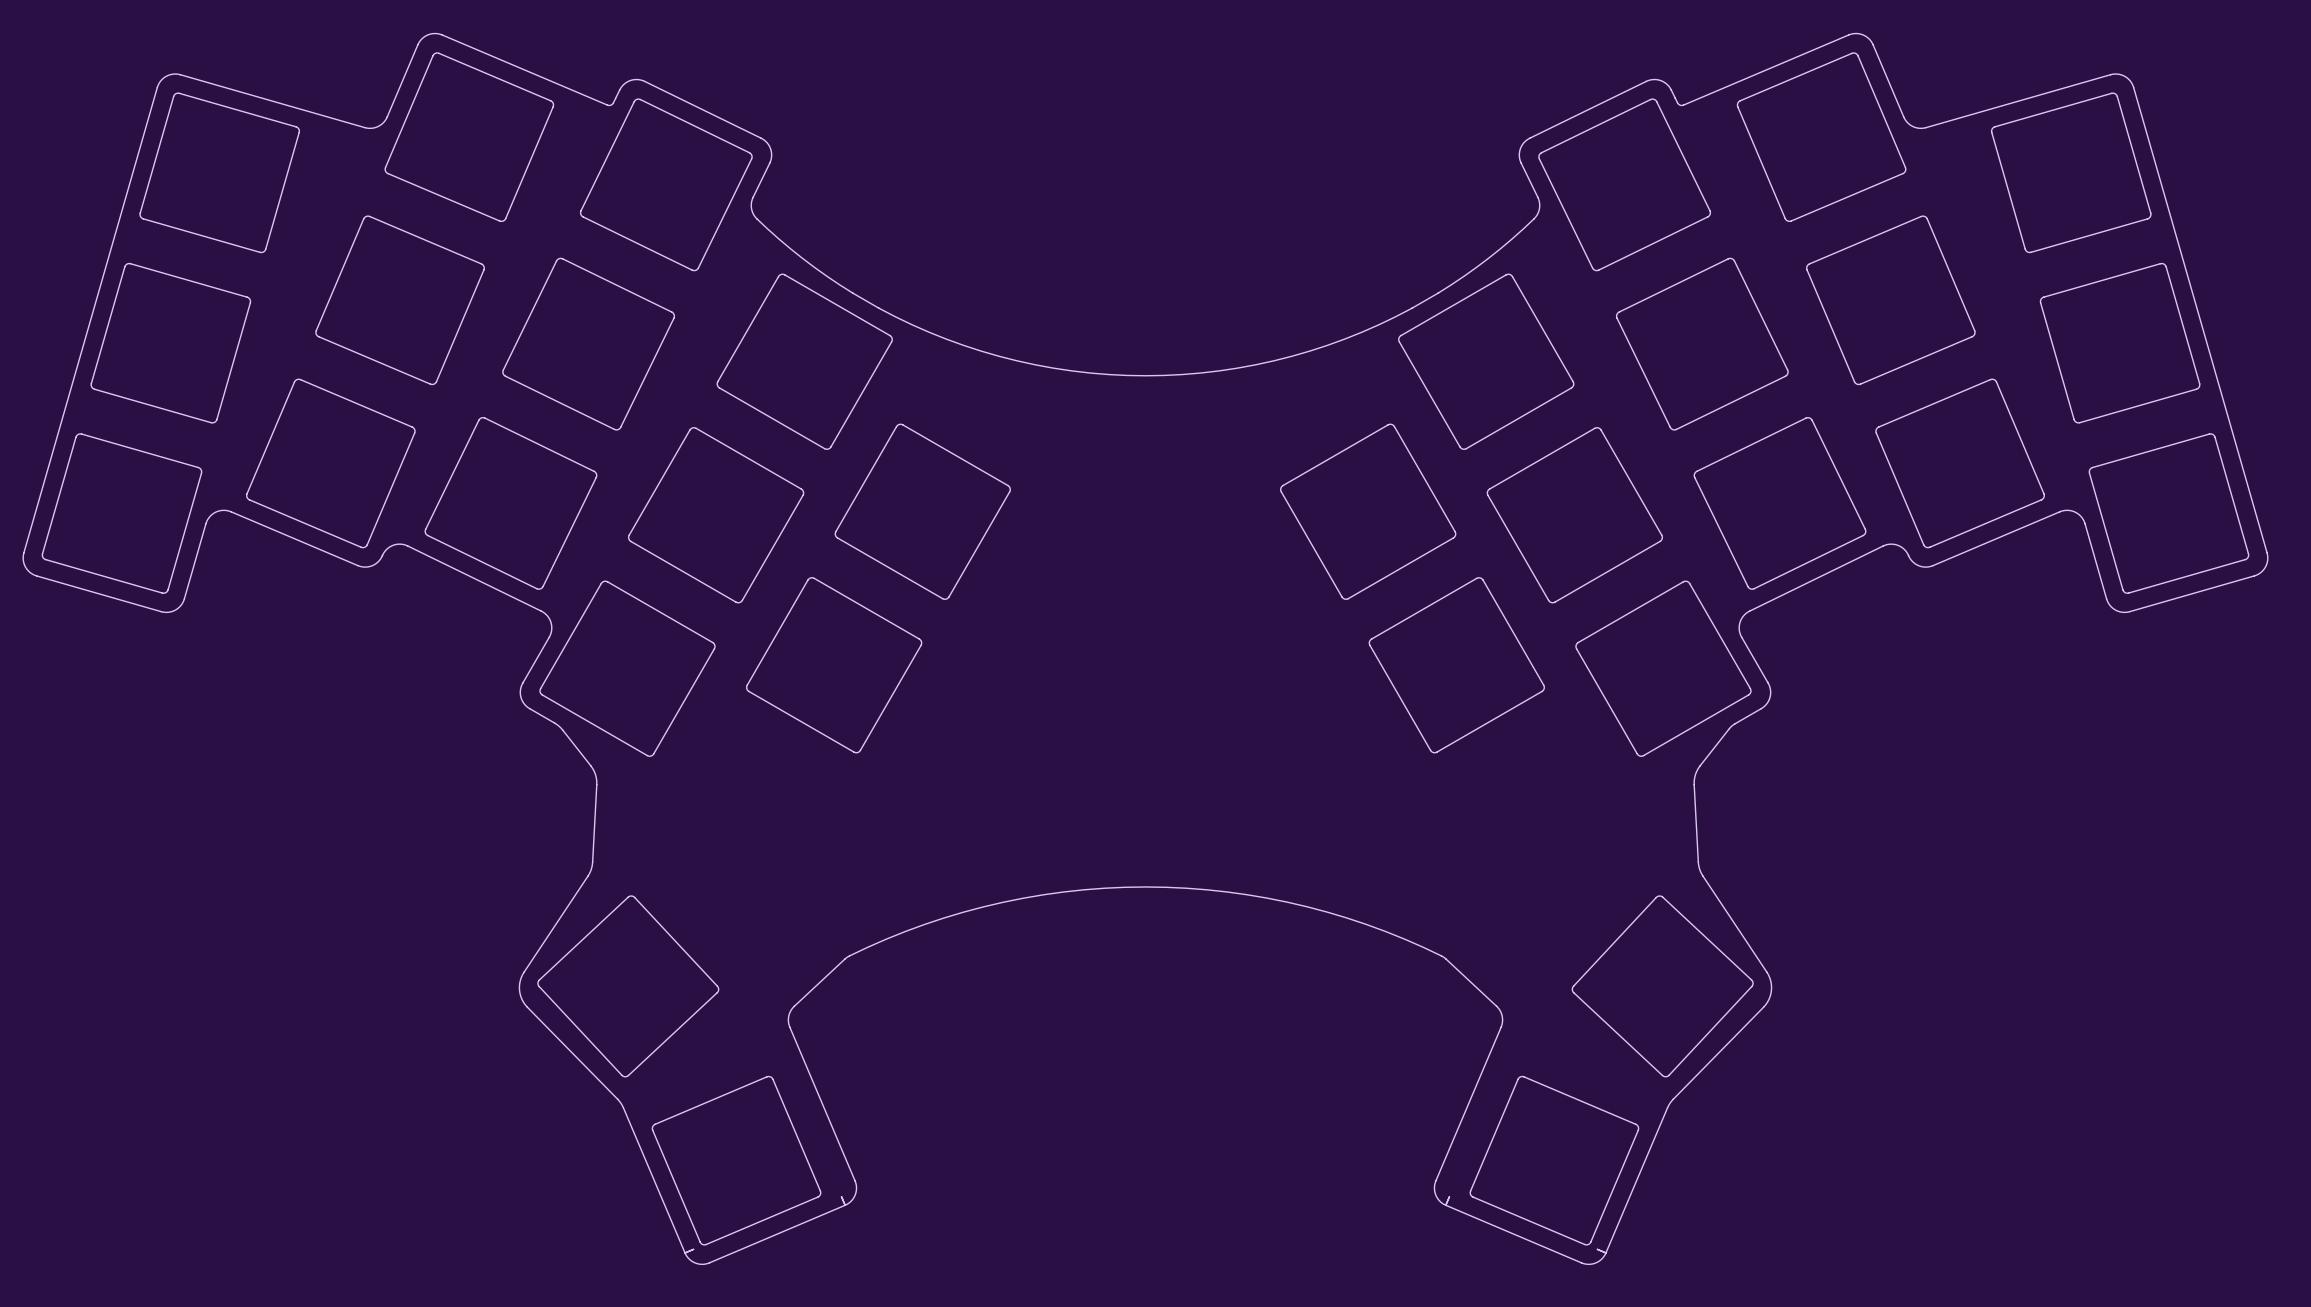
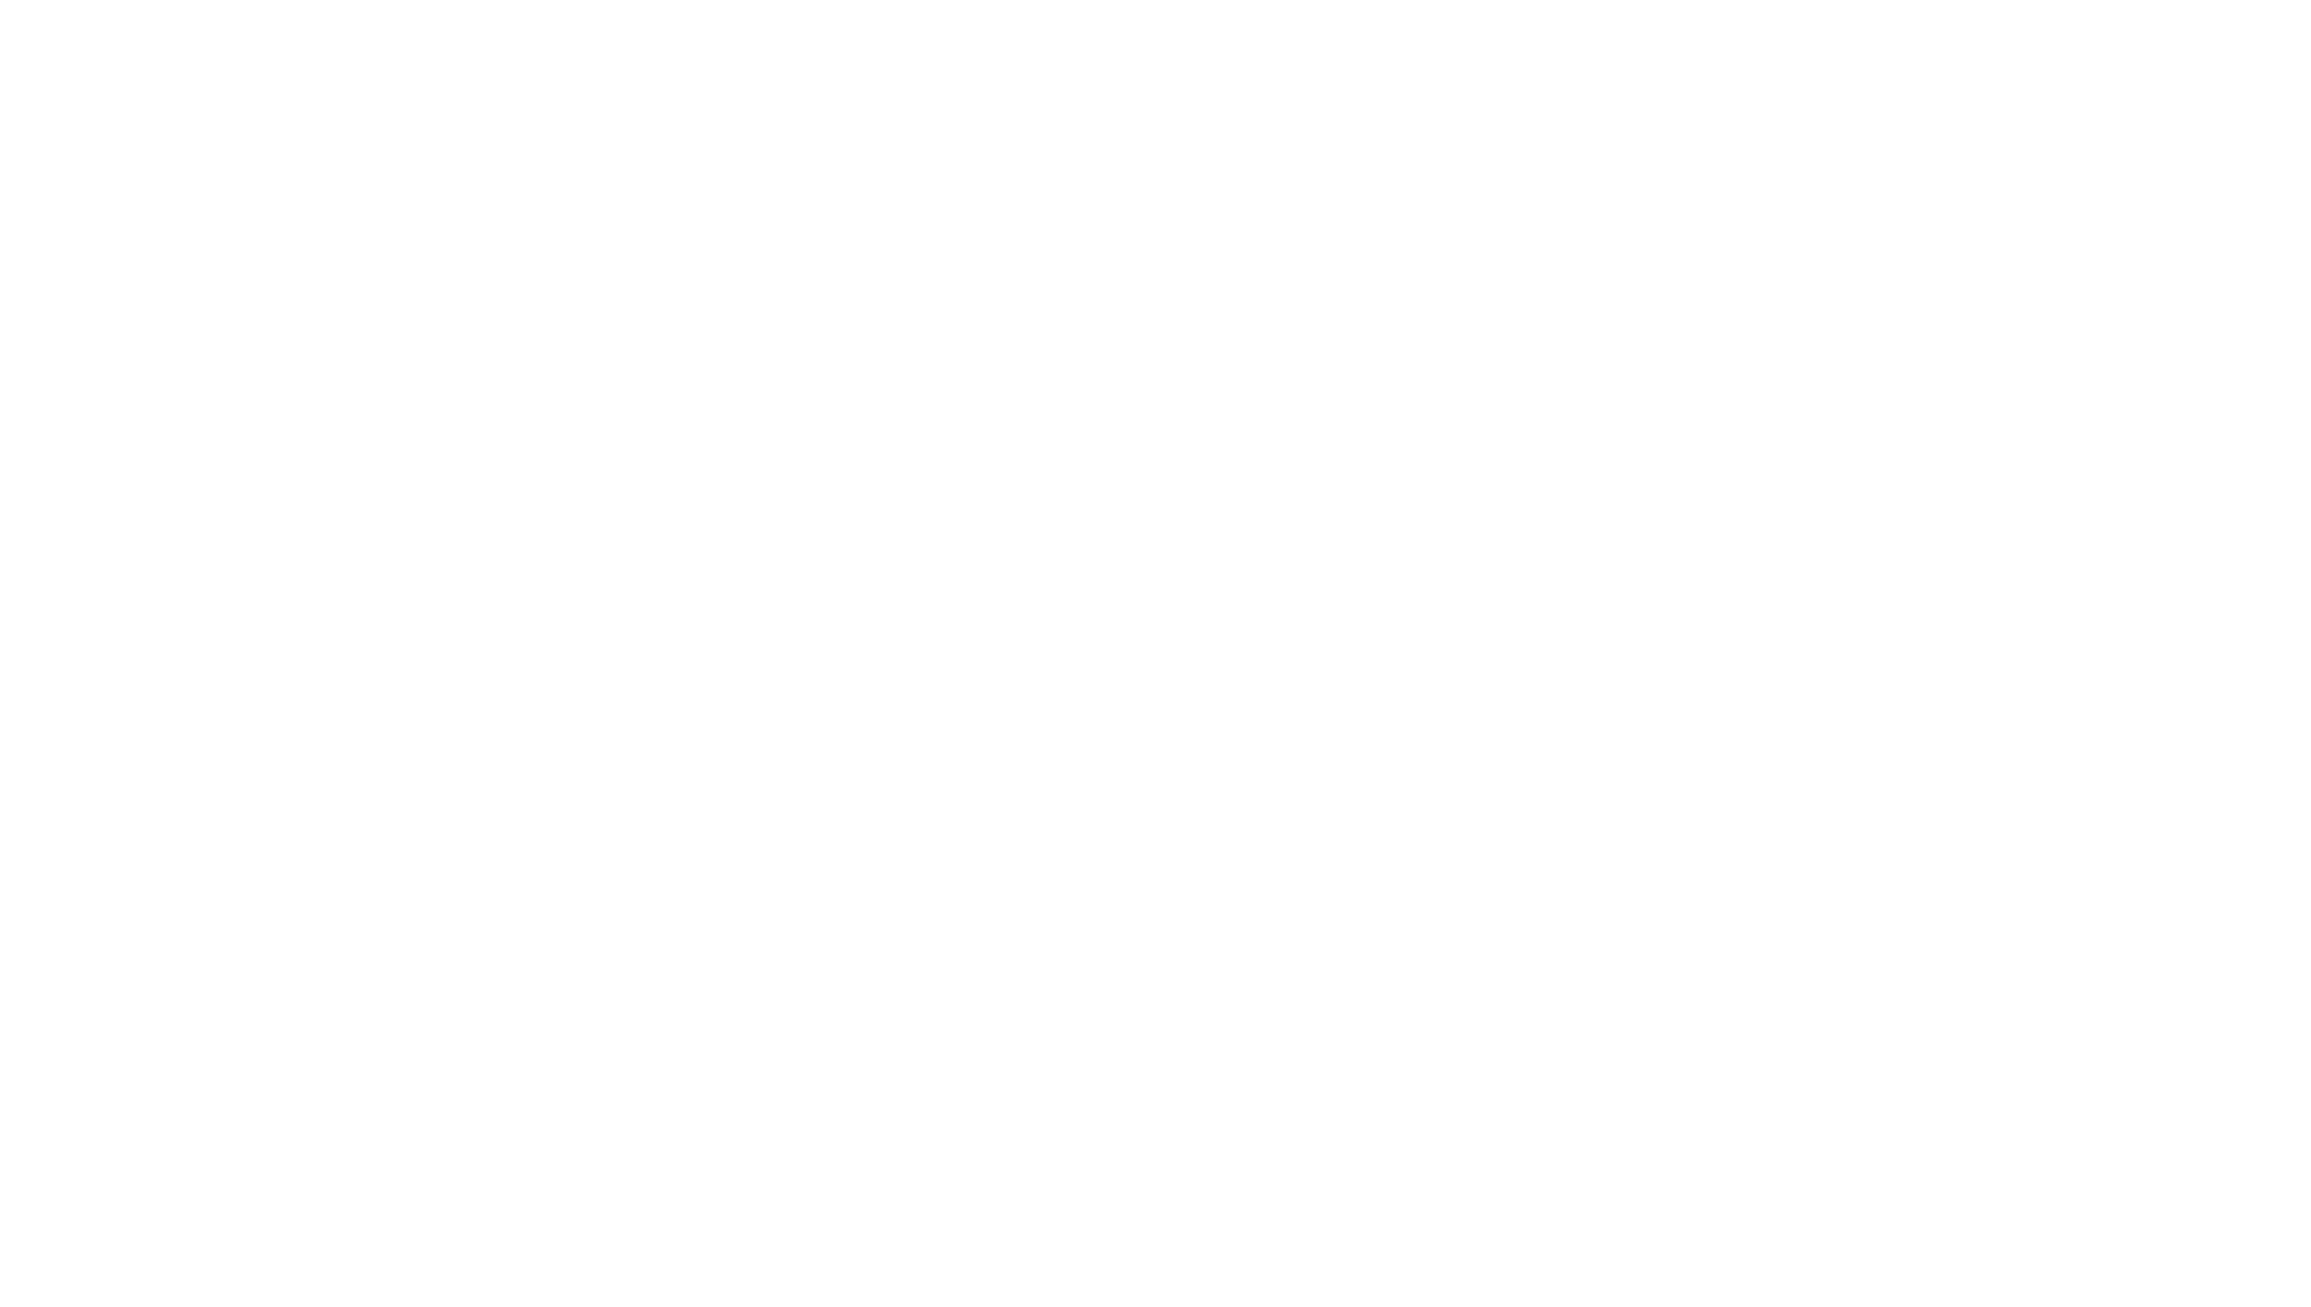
board edge: (439, 53) (553, 103) (503, 221) (385, 171) (432, 55) (439, 53) -> none
board edge: (1851, 53) (1737, 103) (1787, 221) (1905, 171) (1858, 55) (1851, 53) -> none
board edge: (179, 93) (298, 129) (263, 251) (140, 216) (173, 96) (179, 93) -> none
board edge: (2111, 93) (1992, 129) (2027, 251) (2150, 216) (2117, 96) (2111, 93) -> none
board edge: (640, 99) (751, 155) (695, 270) (580, 214) (634, 101) (640, 99) -> none
board edge: (1650, 99) (1539, 155) (1595, 270) (1710, 214) (1656, 101) (1650, 99) -> none
board edge: (369, 216) (483, 266) (433, 384) (316, 334) (363, 218) (369, 216) -> none
board edge: (1921, 216) (1807, 266) (1857, 384) (1974, 334) (1927, 218) (1921, 216) -> none
board edge: (562, 258) (674, 314) (618, 429) (503, 373) (556, 261) (562, 258) -> none
board edge: (1728, 258) (1616, 314) (1672, 429) (1787, 373) (1734, 261) (1728, 258) -> none
board edge: (130, 263) (249, 299) (214, 422) (91, 387) (124, 266) (130, 263) -> none
board edge: (2160, 263) (2041, 299) (2076, 422) (2199, 387) (2166, 266) (2160, 263) -> none
board edge: (784, 274) (892, 338) (828, 449) (717, 385) (778, 276) (784, 274) -> none
board edge: (1506, 274) (1398, 338) (1462, 449) (1573, 385) (1512, 276) (1506, 274) -> none
board edge: (300, 379) (414, 429) (364, 547) (247, 497) (294, 382) (300, 379) -> none
board edge: (1990, 379) (1876, 429) (1926, 547) (2043, 497) (1996, 382) (1990, 379) -> none
board edge: (485, 418) (596, 474) (540, 588) (425, 532) (478, 420) (481, 417) (485, 418) -> none
board edge: (1805, 418) (1694, 474) (1750, 588) (1865, 532) (1812, 420) (1805, 418) -> none
board edge: (902, 424) (1010, 488) (946, 599) (835, 535) (896, 426) (902, 424) -> none
board edge: (1388, 424) (1280, 488) (1344, 599) (1455, 535) (1394, 426) (1388, 424) -> none
board edge: (696, 428) (803, 491) (739, 602) (628, 538) (689, 430) (696, 428) -> none
board edge: (1594, 428) (1487, 491) (1551, 602) (1662, 538) (1601, 430) (1594, 428) -> none
board edge: (81, 434) (201, 469) (165, 592) (42, 557) (75, 437) (78, 434) (79, 433) (81, 434) -> none
board edge: (2209, 434) (2089, 469) (2125, 592) (2248, 557) (2215, 437) (2209, 434) -> none
board edge: (814, 578) (921, 641) (857, 752) (746, 688) (807, 580) (814, 578) -> none
board edge: (1476, 578) (1369, 641) (1433, 752) (1544, 688) (1483, 580) (1476, 578) -> none
board edge: (607, 581) (714, 645) (650, 756) (540, 692) (601, 583) (607, 581) -> none
board edge: (1683, 581) (1576, 645) (1640, 756) (1750, 692) (1689, 583) (1683, 581) -> none
board edge: (628, 897) (537, 983) (625, 1076) (718, 989) (634, 897) (628, 897) -> none
board edge: (1662, 897) (1753, 983) (1665, 1076) (1572, 989) (1656, 897) (1662, 897) -> none
board edge: (766, 1076) (652, 1126) (702, 1244) (820, 1194) (772, 1079) (766, 1076) -> none
board edge: (1524, 1076) (1638, 1126) (1588, 1244) (1470, 1194) (1518, 1079) (1524, 1076) -> none
board edge: (845, 1205) (707, 1263) (695, 1262) (685, 1252) -> none
board edge: (845, 1205) (841, 1196) (845, 1205) -> none
board edge: (1445, 1205) (1583, 1263) (1595, 1262) (1605, 1252) -> none
board edge: (1445, 1205) (1449, 1196) (1445, 1205) -> none
board edge: (1445, 1205) (1436, 1196) (1435, 1182) (1501, 1027) (1502, 1016) (1498, 1007) (1442, 956) (1366, 924) (1327, 912) (1267, 898) (1206, 889) (1145, 886) (1084, 889) (1023, 898) (983, 906) (924, 924) (848, 956) (792, 1007) (788, 1018) (789, 1027) (855, 1182) (854, 1196) (845, 1205) -> none
board edge: (685, 1252) (693, 1249) (685, 1252) -> none
board edge: (1605, 1252) (1670, 1103) (1763, 1007) (1770, 993) (1771, 983) (1768, 974) (1702, 876) (1698, 862) (1694, 784) (1696, 771) (1730, 727) (1763, 707) (1770, 695) (1769, 685) (1739, 633) (1739, 622) (1744, 614) (1885, 545) (1899, 546) (1915, 563) (1929, 566) (2066, 510) (2075, 512) (2083, 519) (2107, 601) (2113, 608) (2120, 611) (2129, 611) (2254, 575) (2261, 571) (2266, 565) (2267, 552) (2133, 87) (2129, 80) (2122, 75) (2110, 74) (1921, 128) (1912, 126) (1905, 120) (1872, 43) (1866, 36) (1858, 33) (1848, 35) (1682, 105) (1678, 103) (1666, 83) (1656, 79) (1648, 80) (1523, 142) (1520, 148) (1519, 158) (1538, 199) (1539, 206) (1536, 215) (1488, 258) (1438, 293) (1395, 316) (1361, 332) (1291, 356) (1219, 370) (1145, 375) (1071, 370) (999, 356) (929, 332) (895, 316) (852, 293) (802, 258) (754, 215) (751, 208) (752, 199) (771, 158) (770, 148) (766, 142) (642, 80) (632, 79) (626, 82) (620, 87) (612, 103) (607, 105) (442, 35) (432, 33) (424, 36) (418, 43) (384, 120) (378, 126) (369, 128) (180, 74) (170, 74) (164, 77) (157, 87) (23, 552) (24, 564) (28, 570) (36, 575) (161, 611) (170, 611) (177, 608) (183, 601) (207, 519) (215, 512) (224, 510) (361, 566) (375, 563) (391, 546) (405, 545) (546, 614) (550, 622) (551, 633) (521, 685) (520, 695) (527, 707) (560, 727) (594, 771) (596, 784) (592, 862) (588, 876) (522, 974) (519, 983) (520, 993) (527, 1007) (620, 1103) (685, 1252) -> none
board edge: (1605, 1252) (1597, 1249) (1605, 1252) -> none

